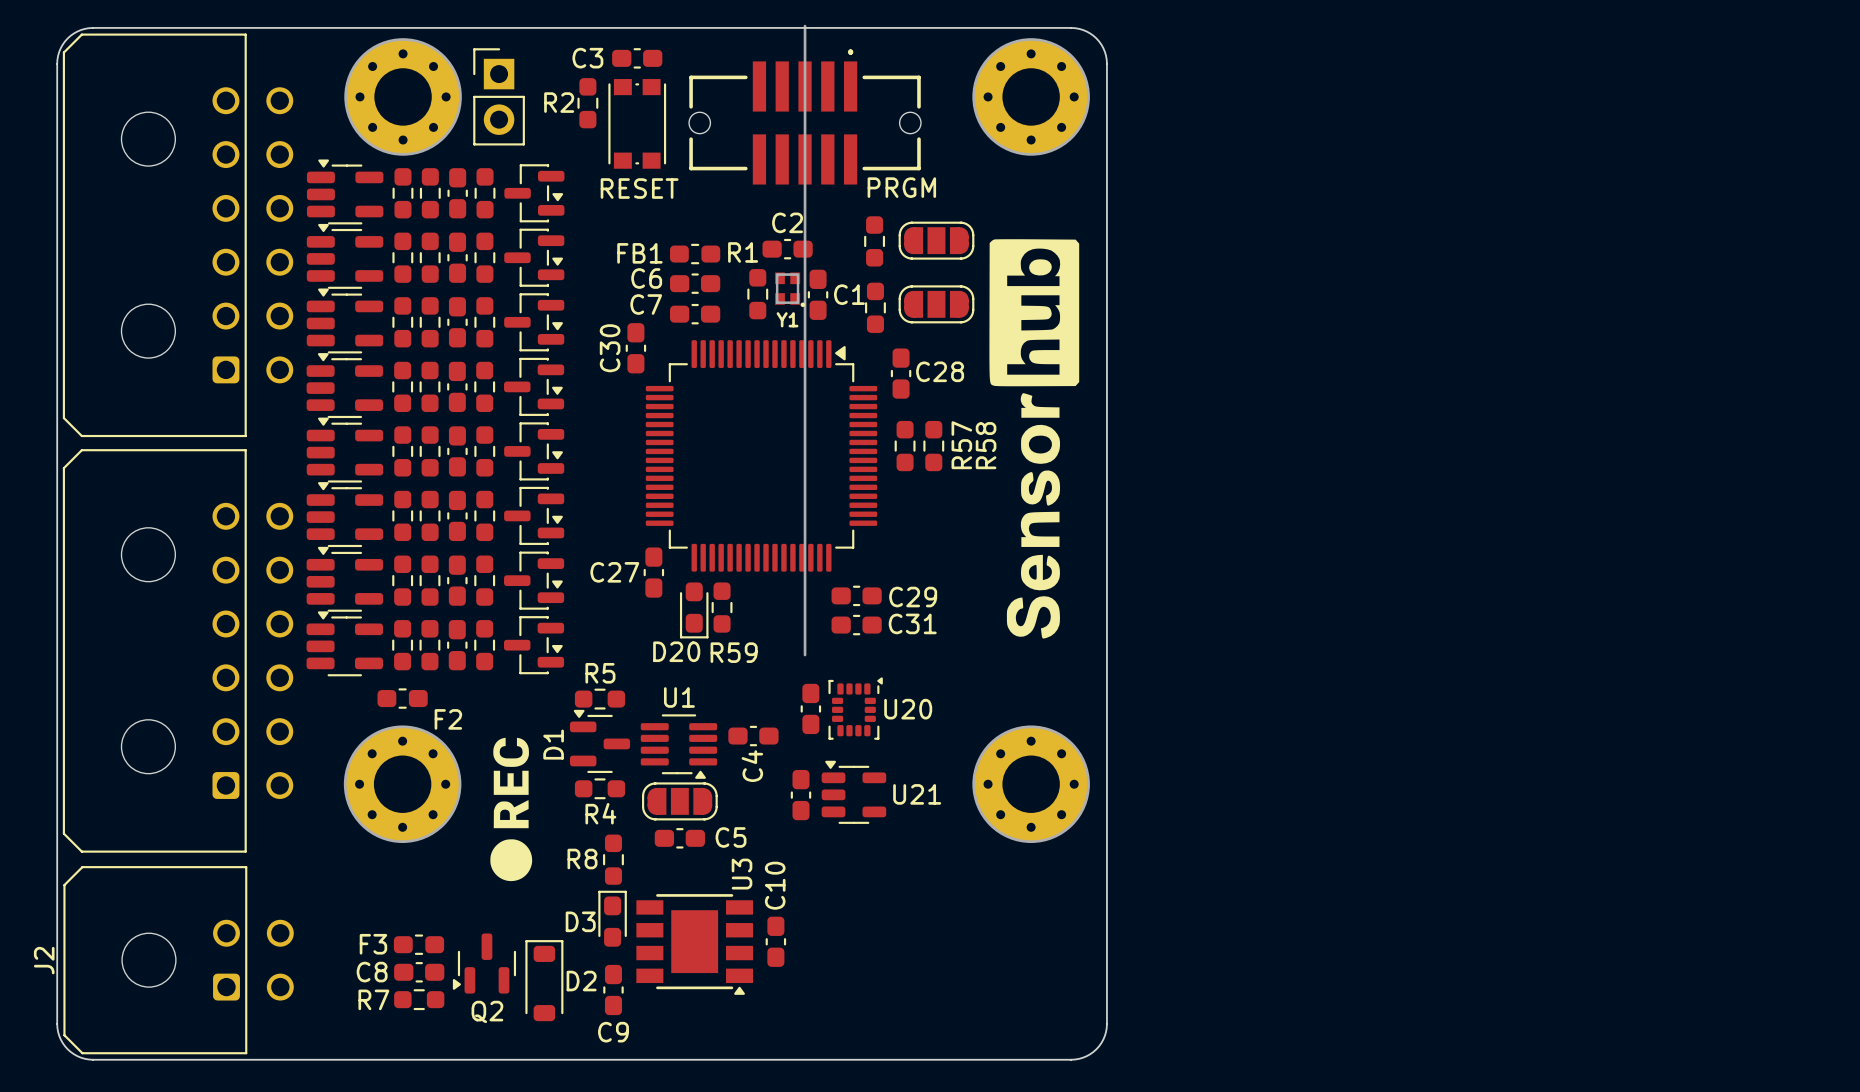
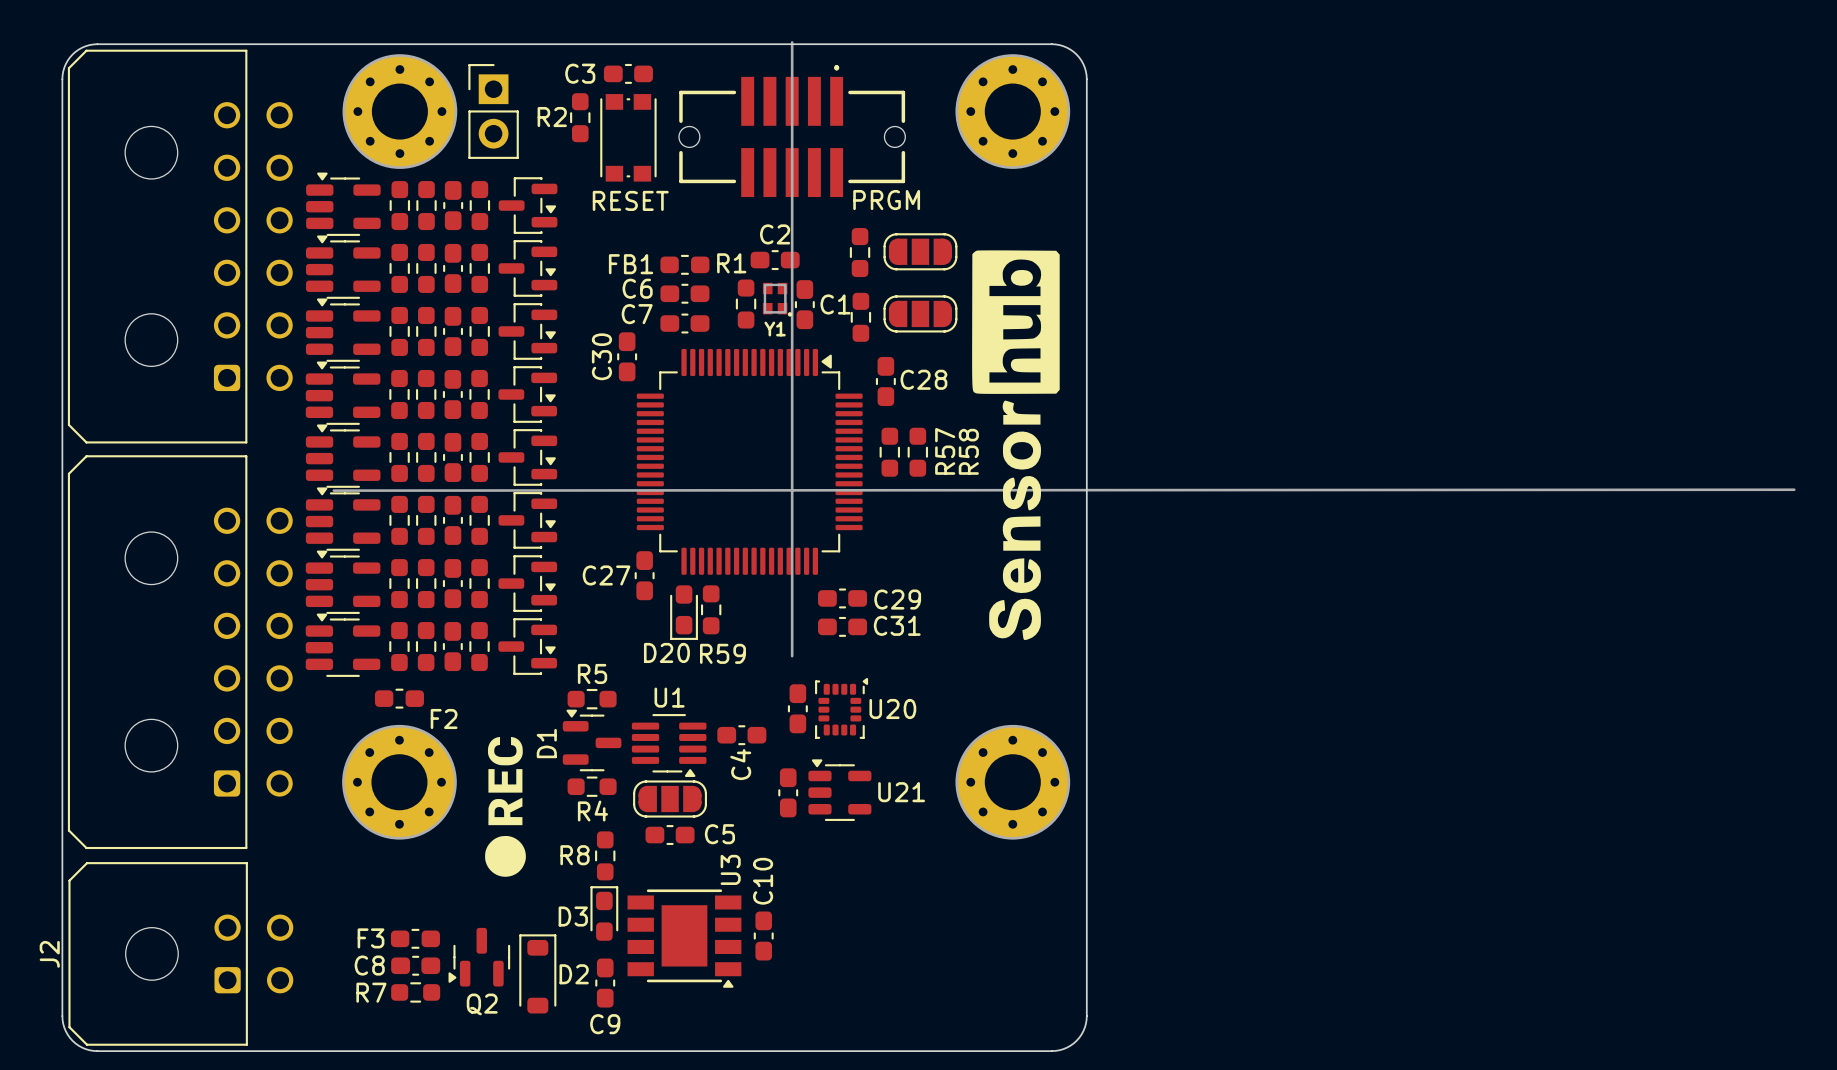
line: none -> (1794, 489) (333, 490)

